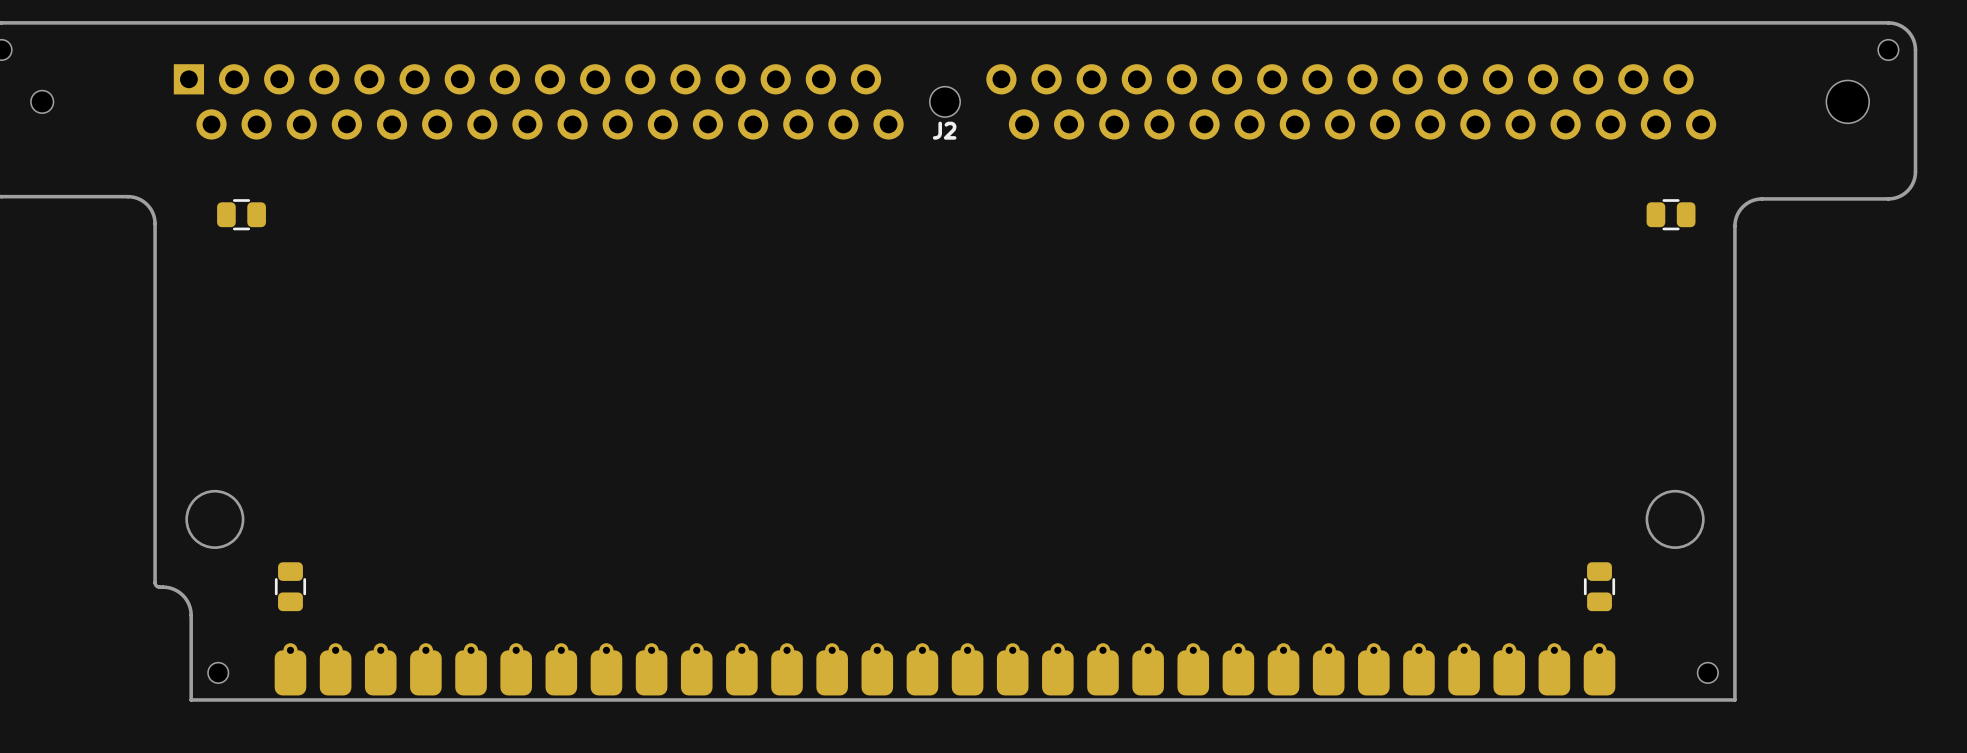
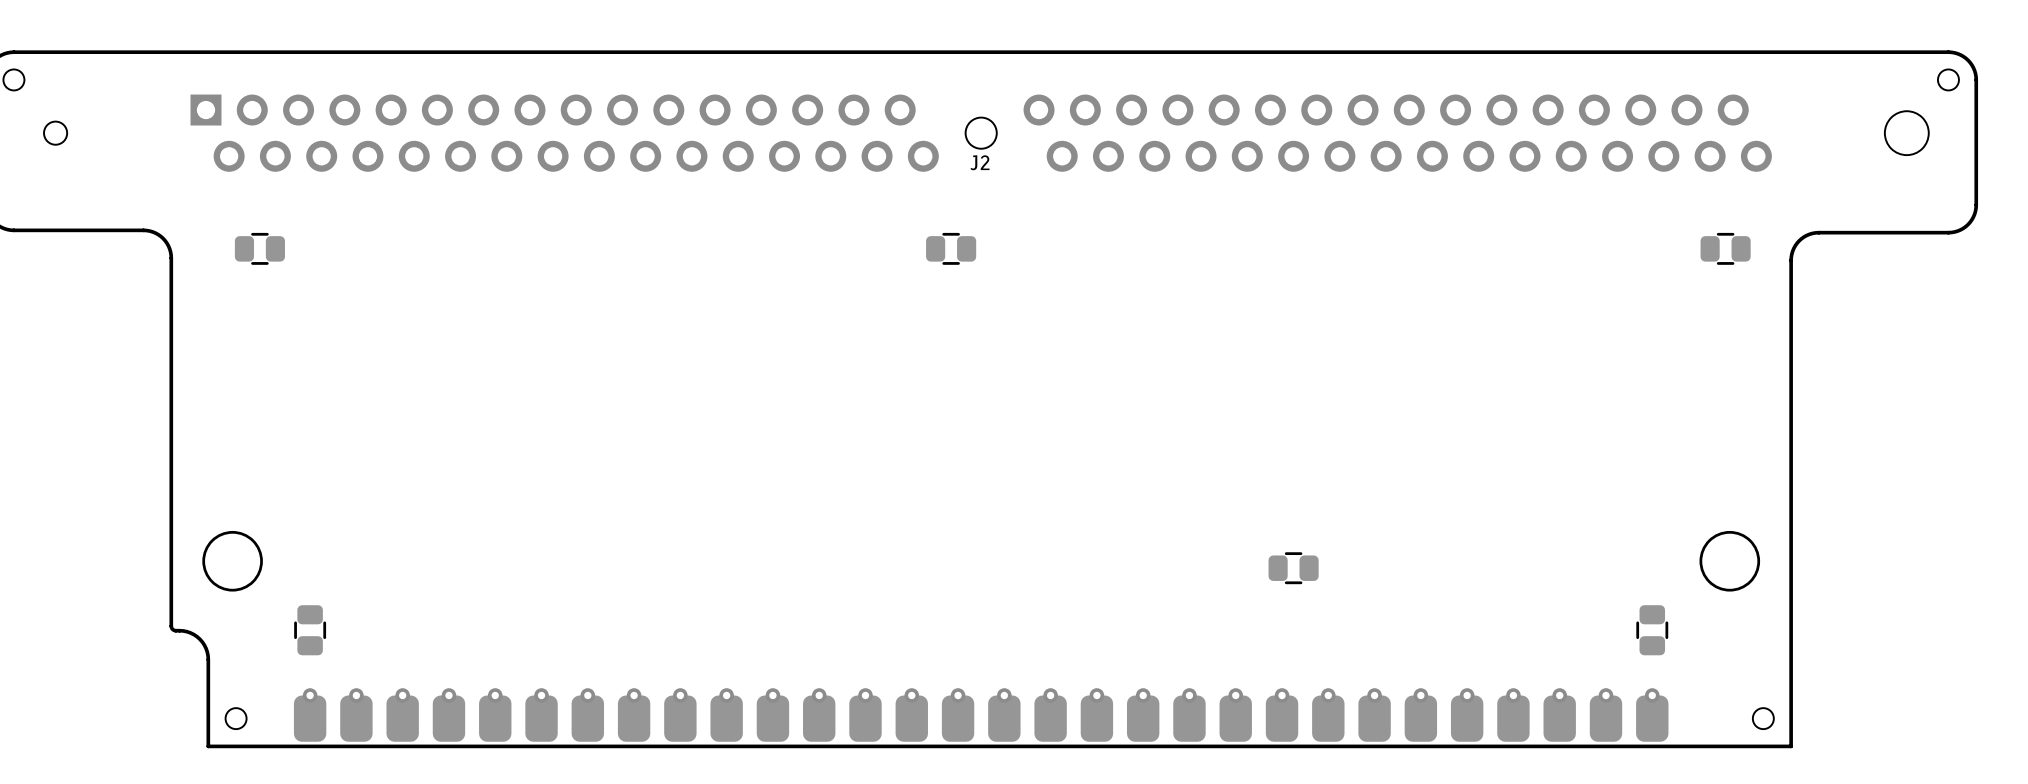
part: none -> (951, 248)
part: none -> (1293, 568)

